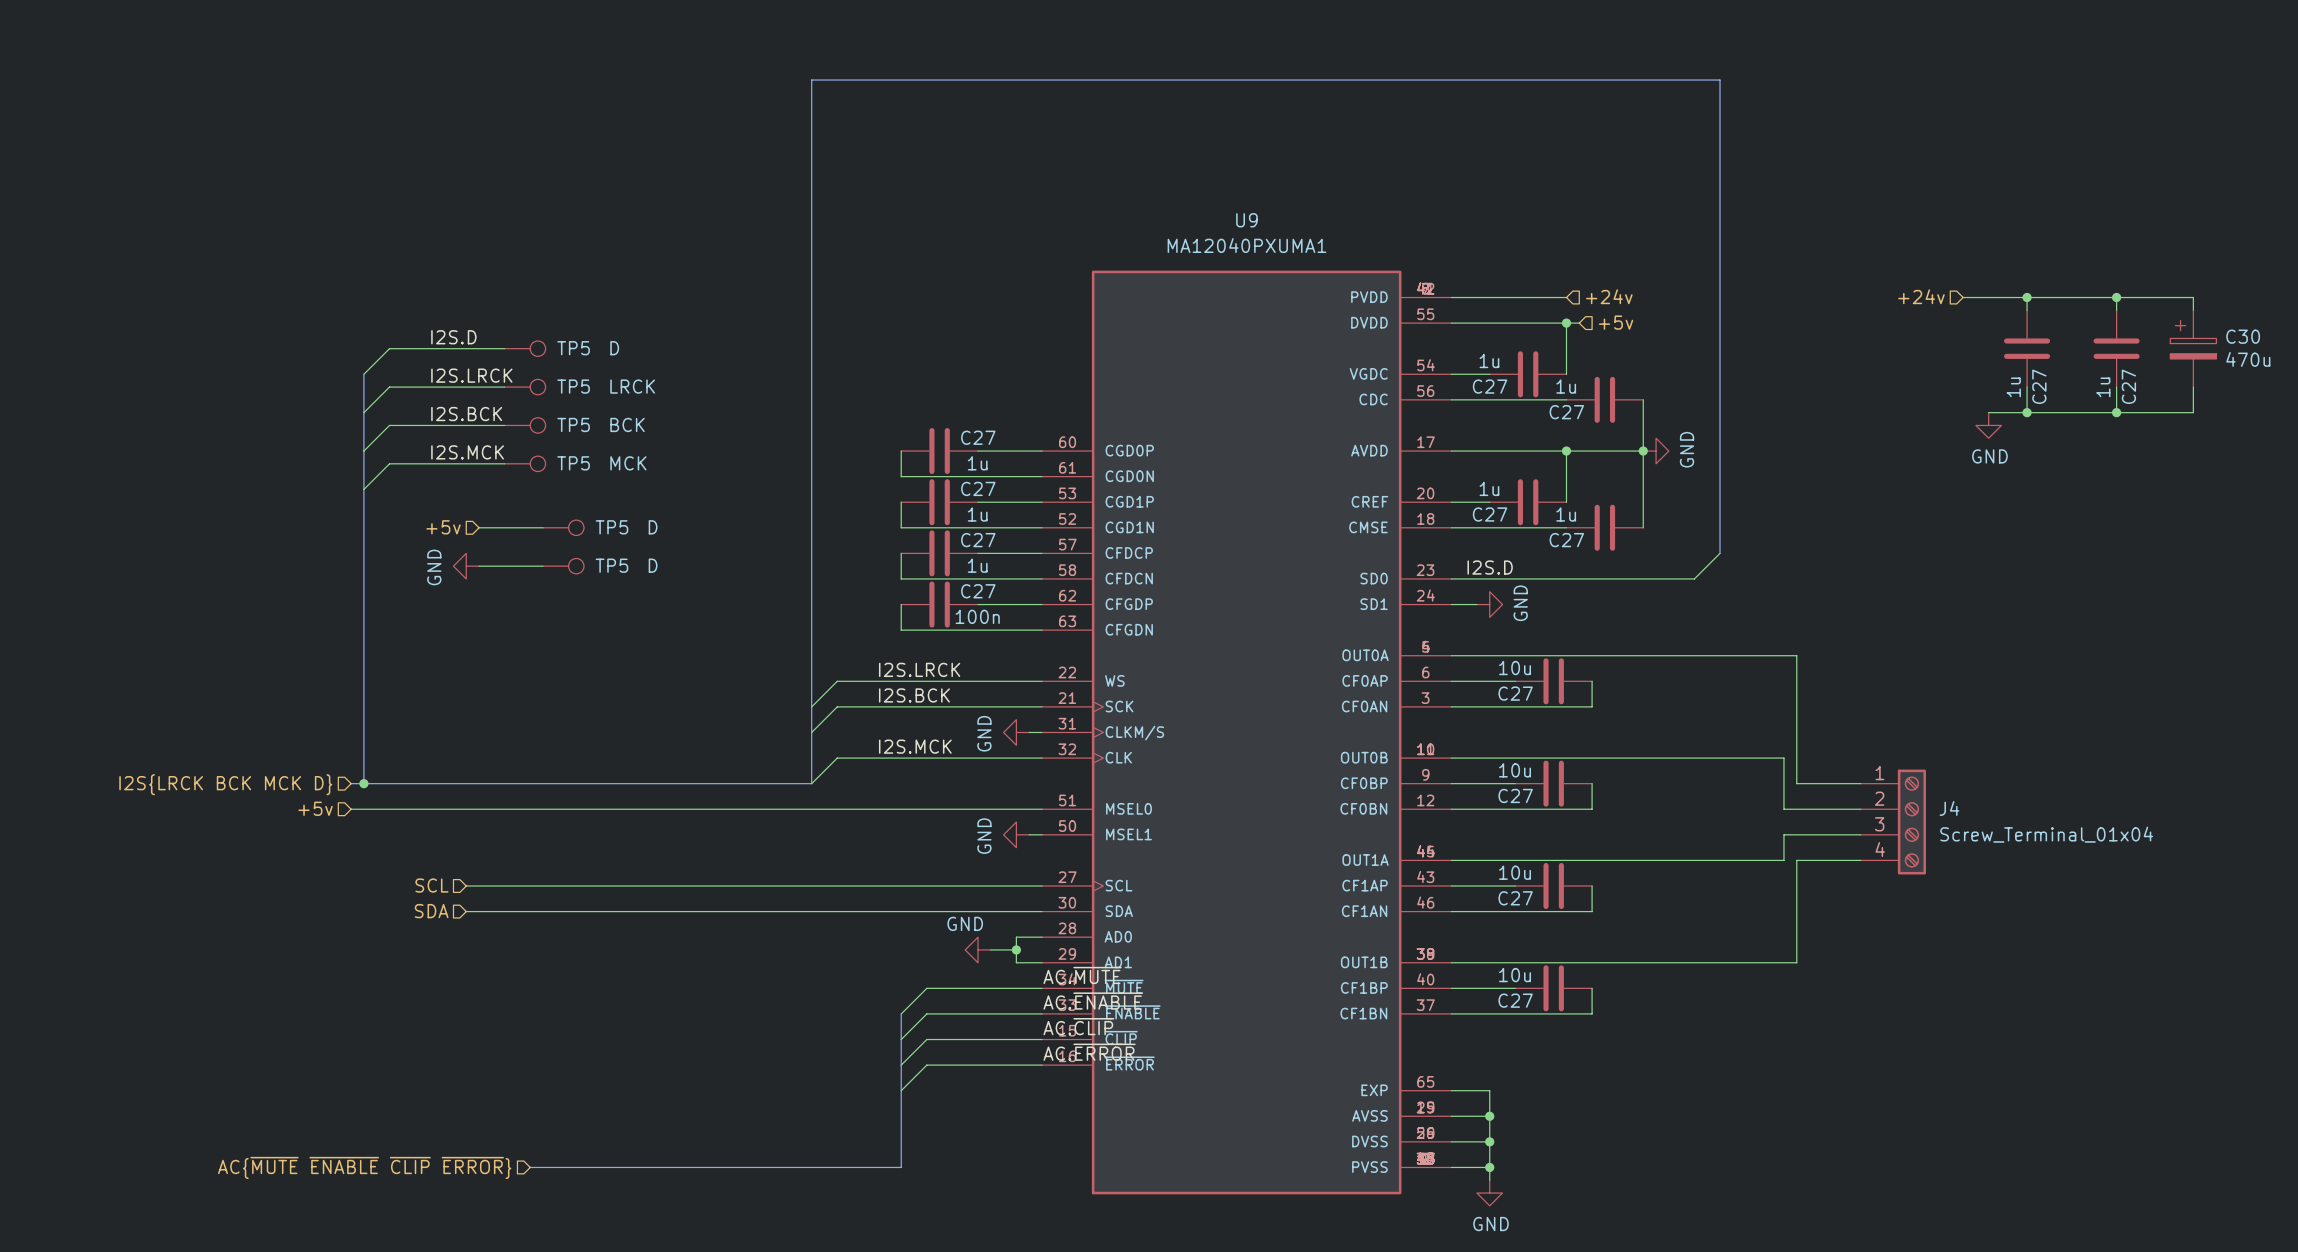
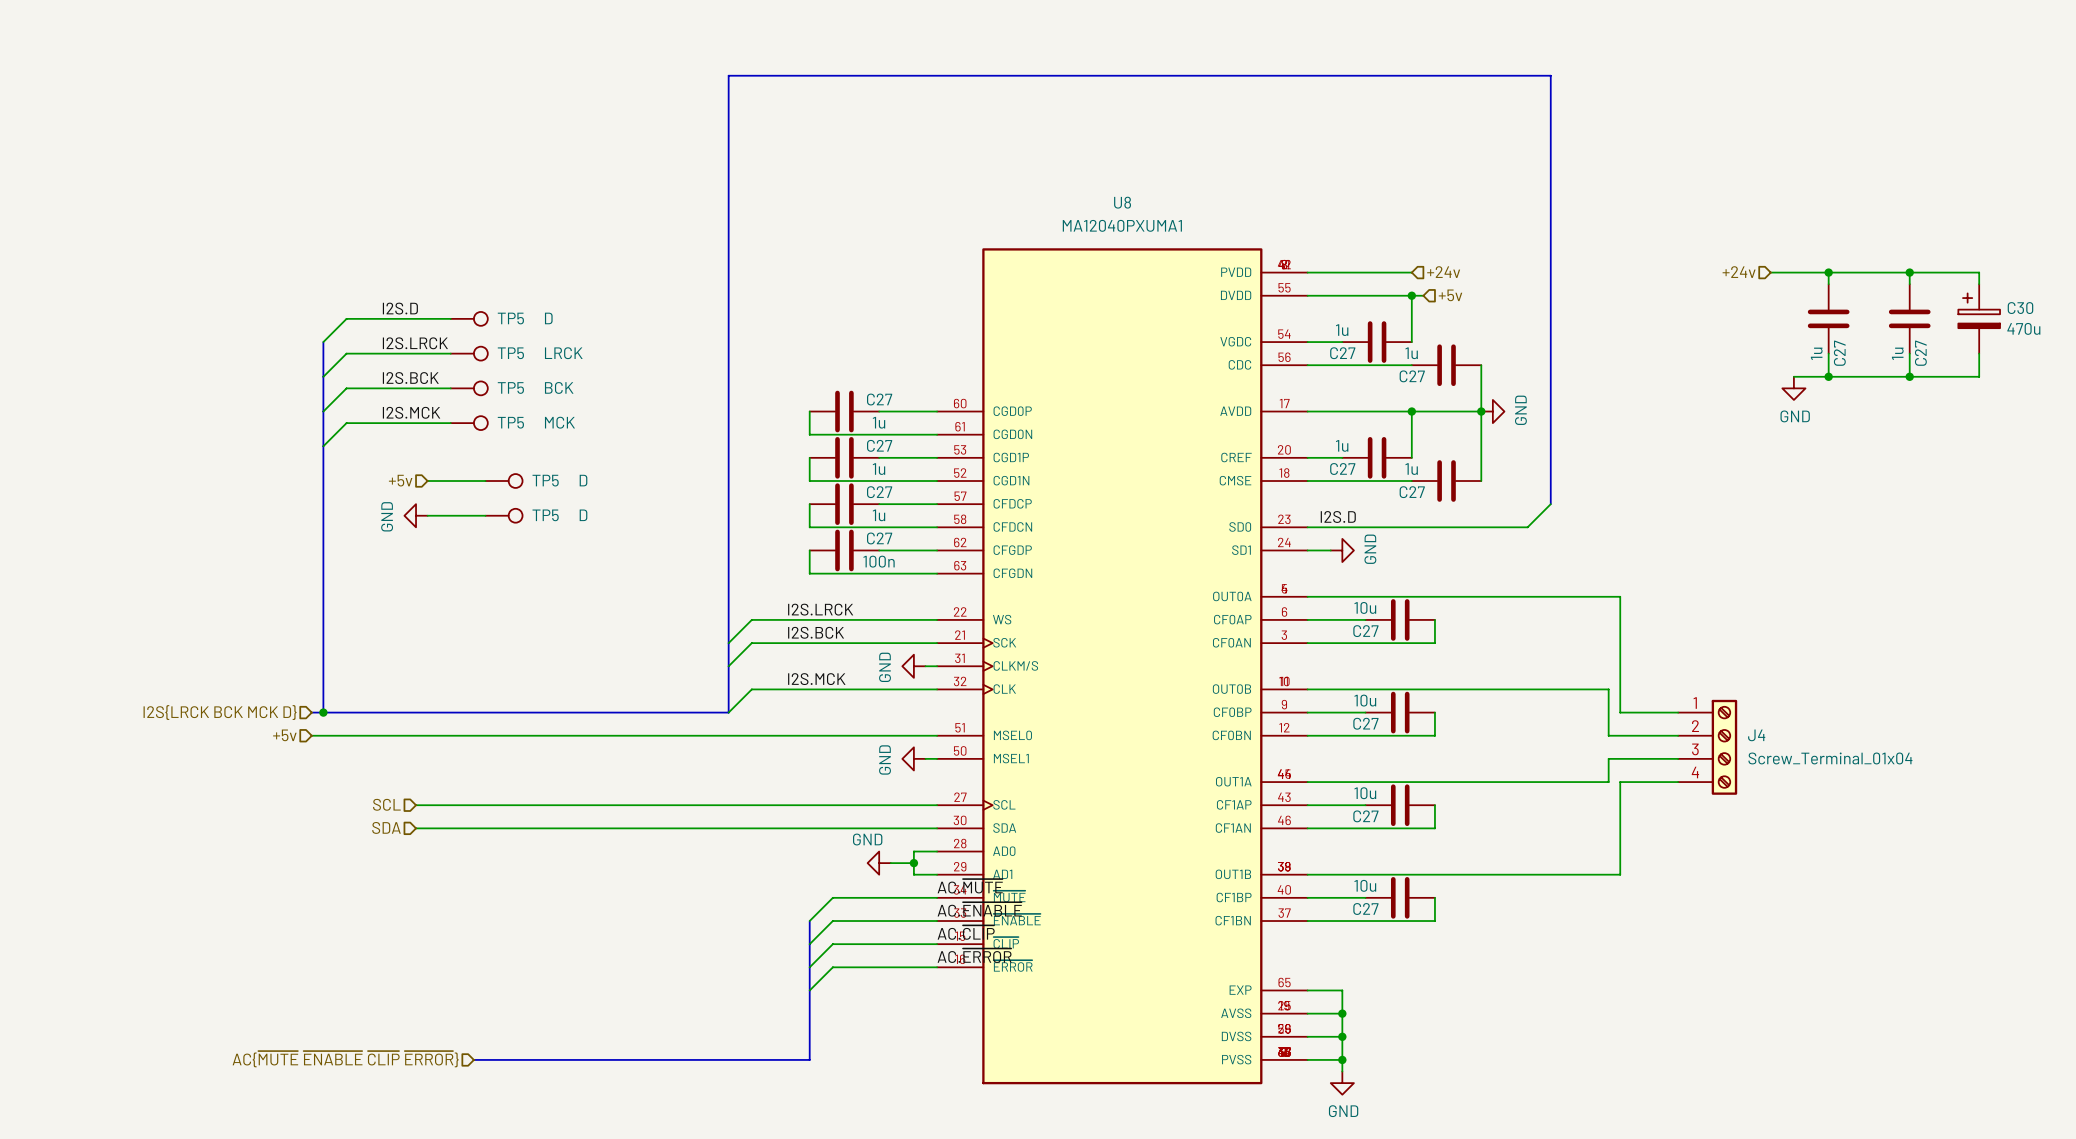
U9 name: U9 (1246, 220) -> U8 (1122, 202)

